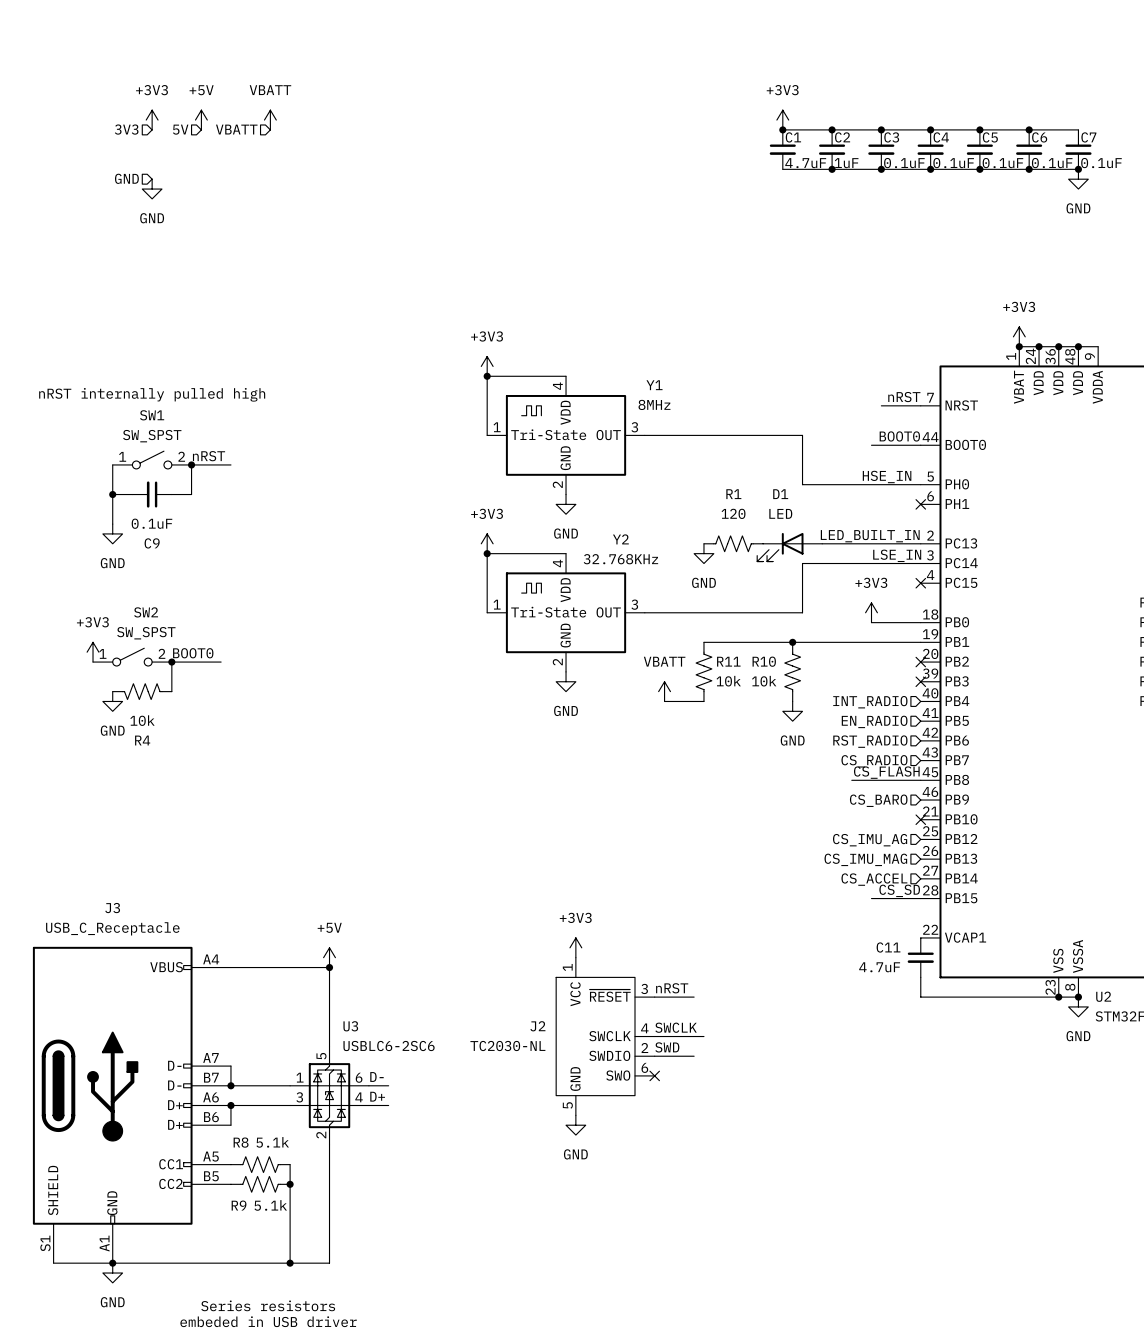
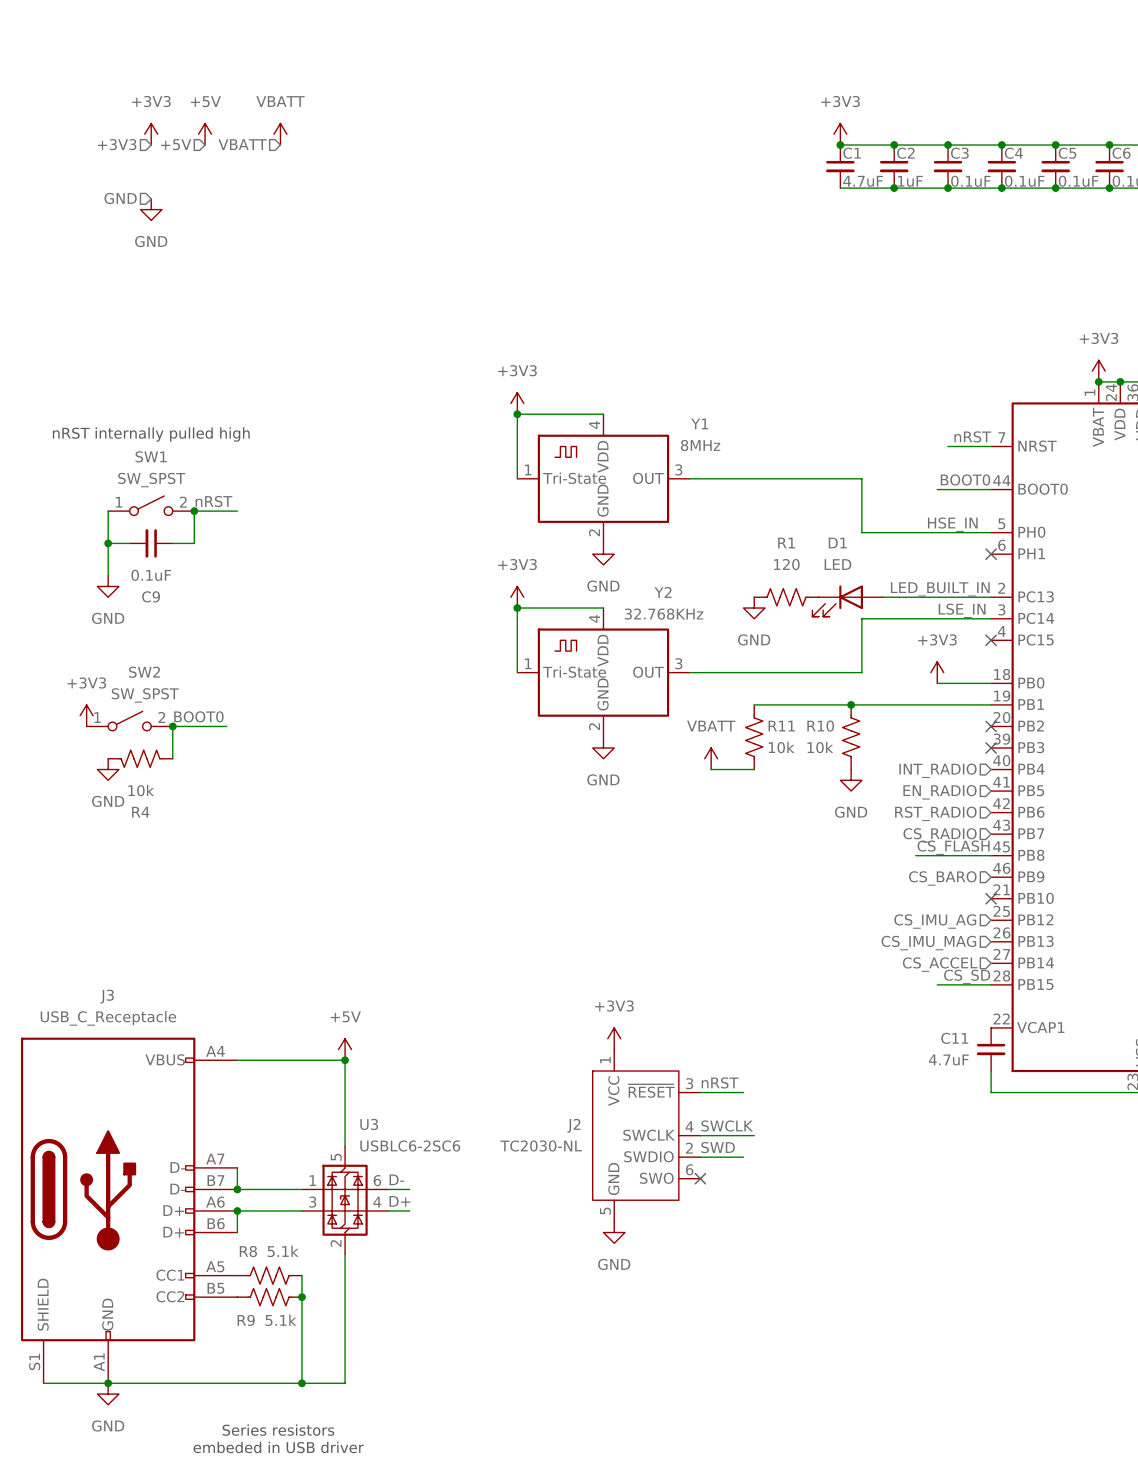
hierarchical label: 3V3 (126, 129) -> +3V3 (117, 144)
hierarchical label: 5V (180, 129) -> +5V (176, 144)

